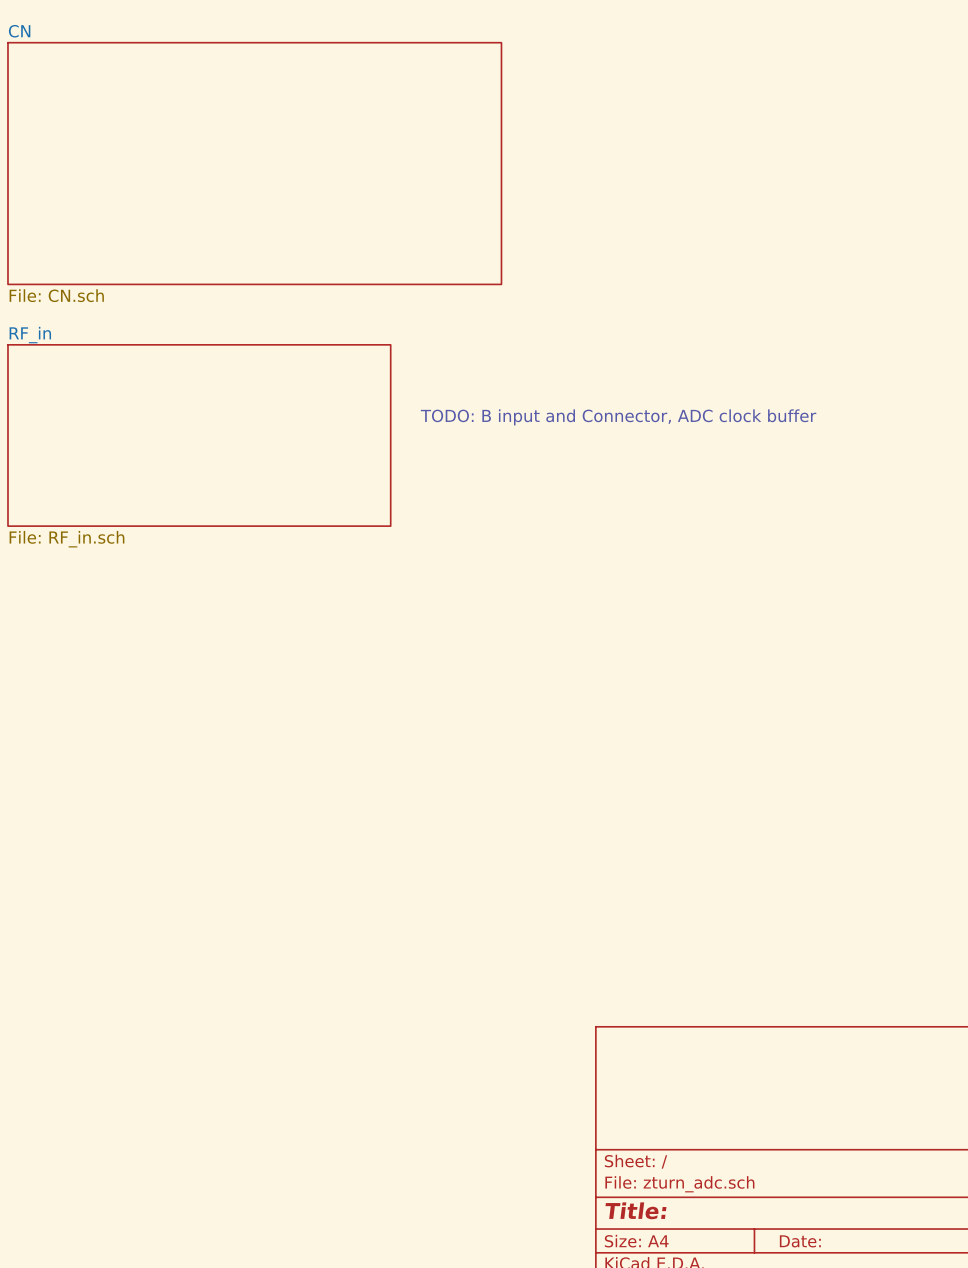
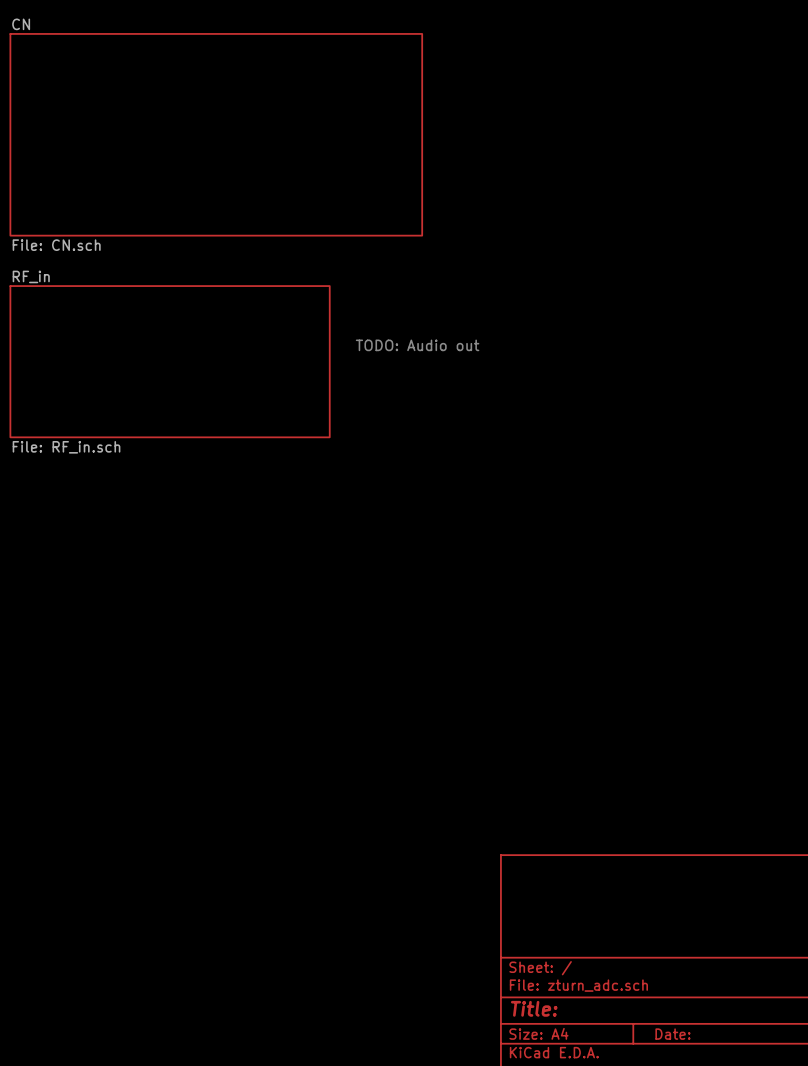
text: TODO: B input and Connector, ADC clock buffer (618, 417) -> TODO: Audio out (417, 345)

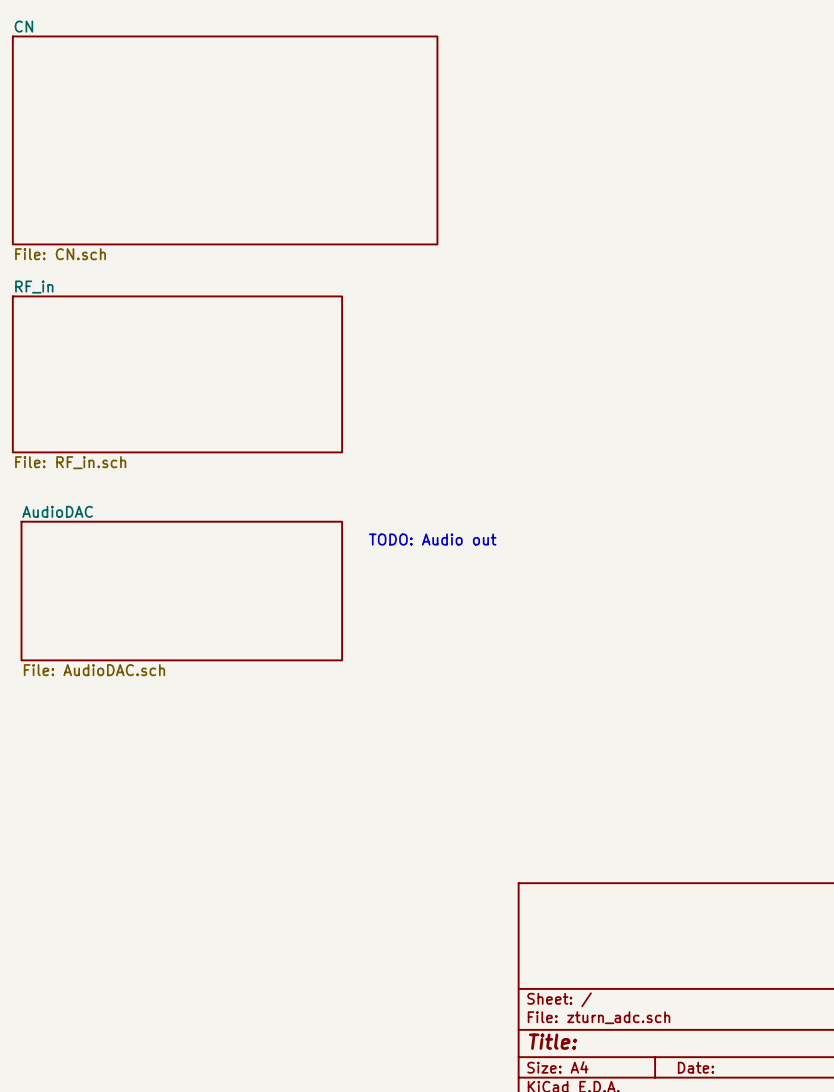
text: TODO: Audio out (417, 345) -> none
text: none -> TODO: Audio out (432, 539)
sheet AudioDAC: none -> File: AudioDAC.sch (181, 591)

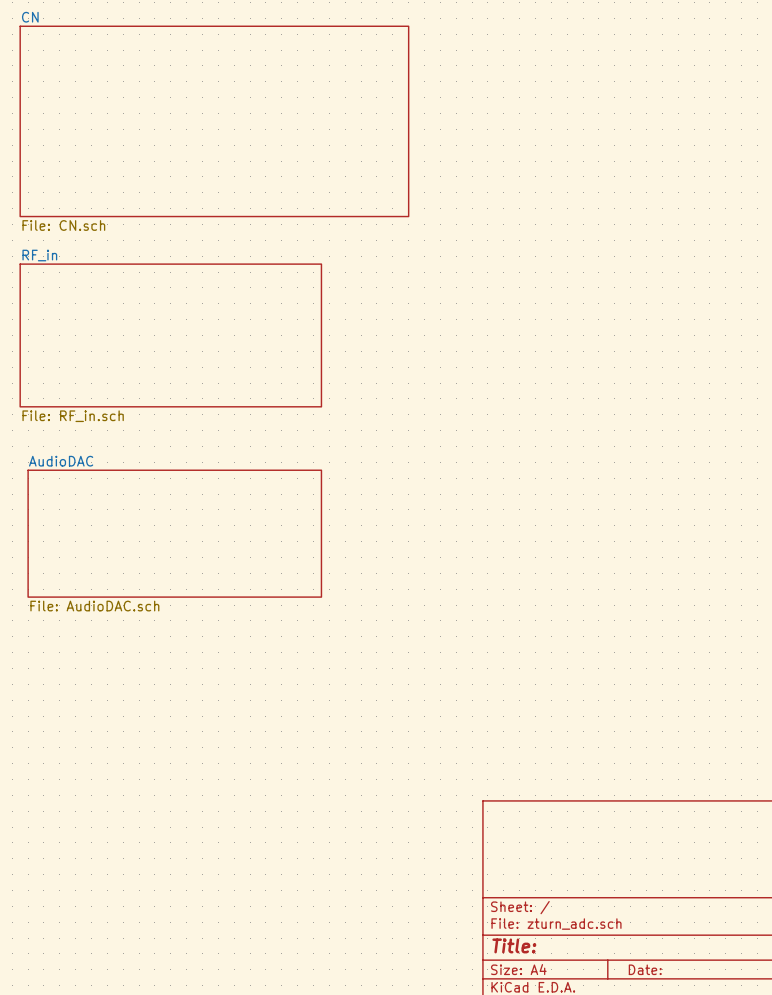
text: TODO: Audio out (432, 539) -> none

